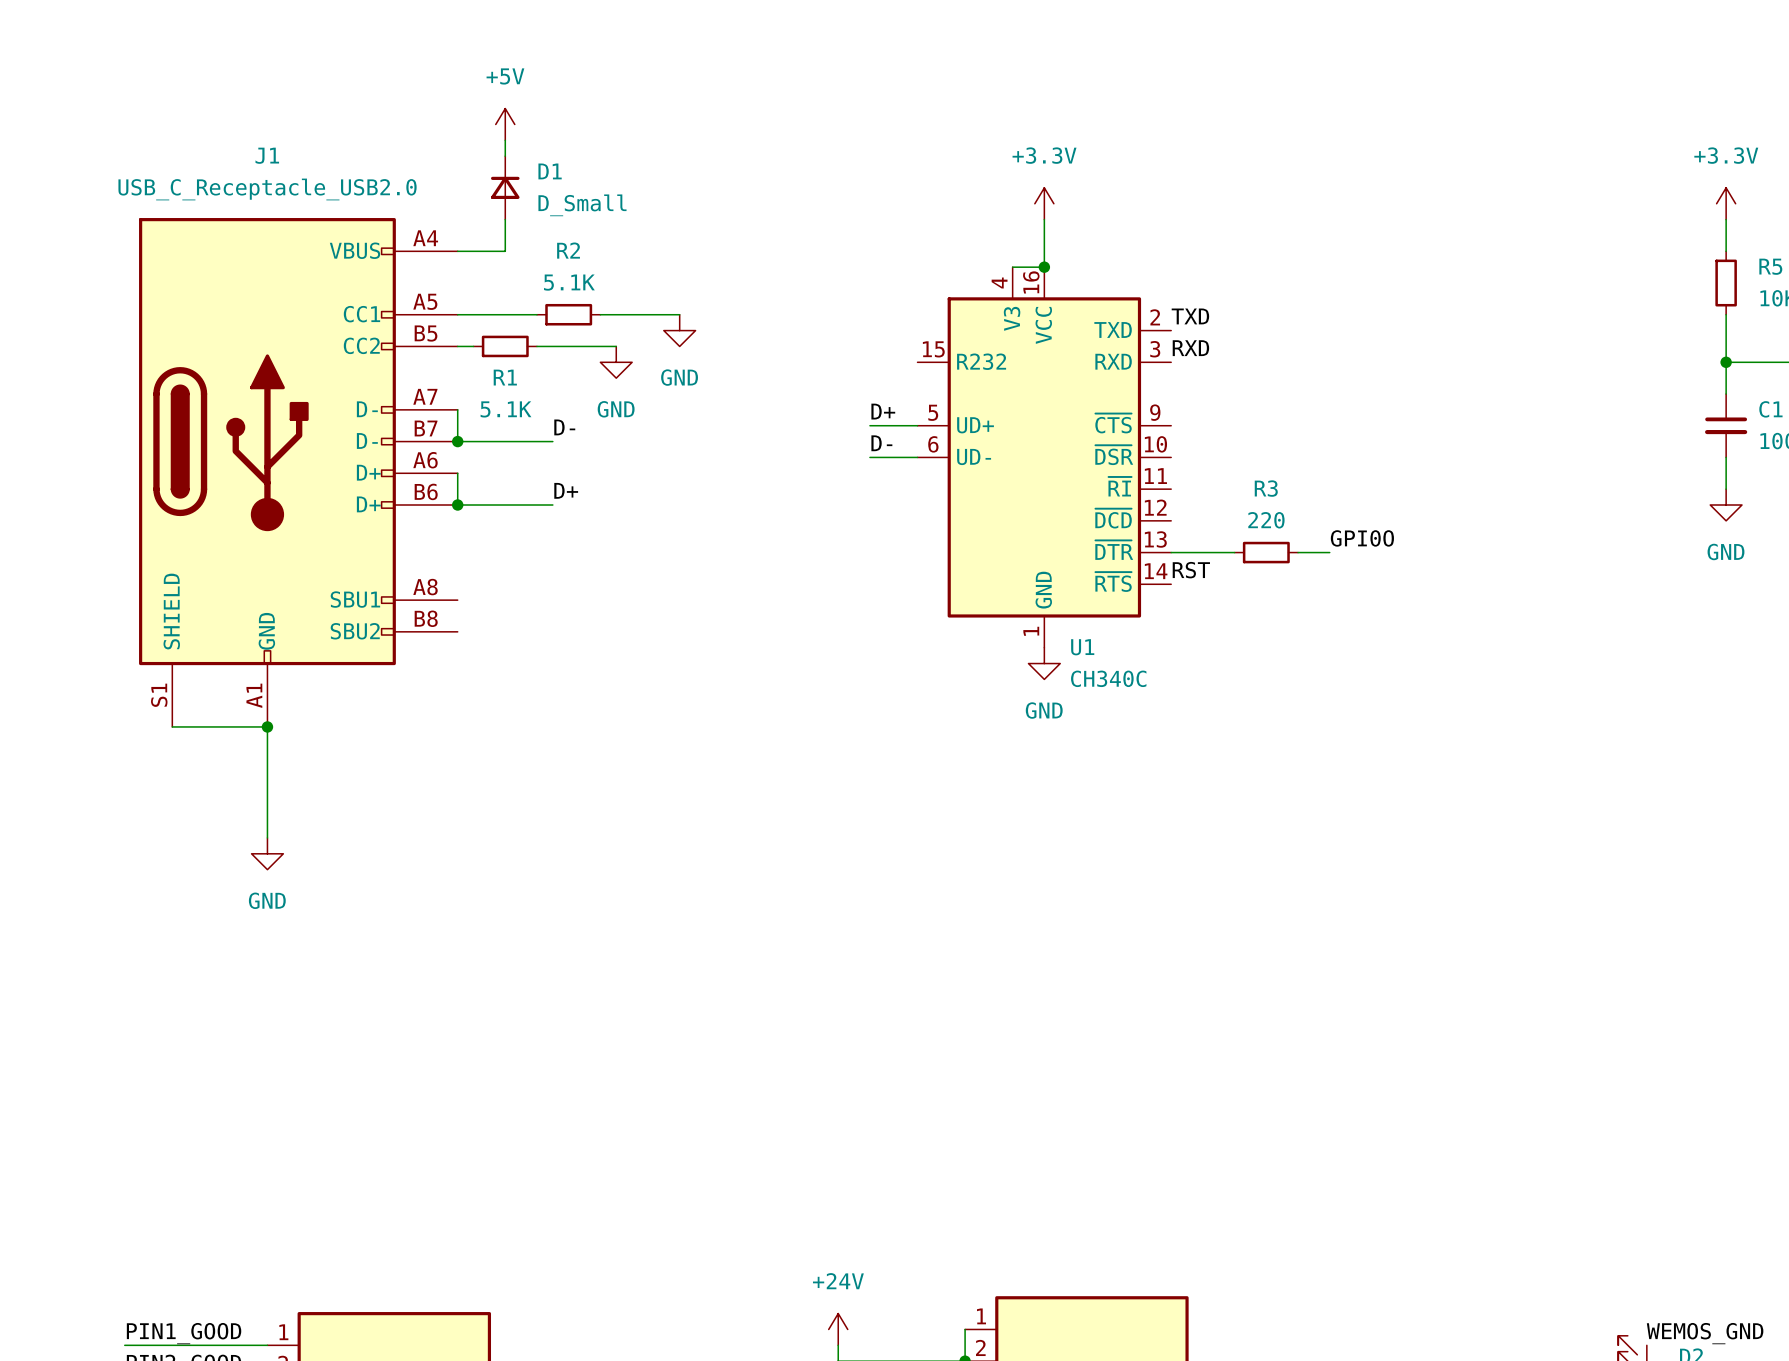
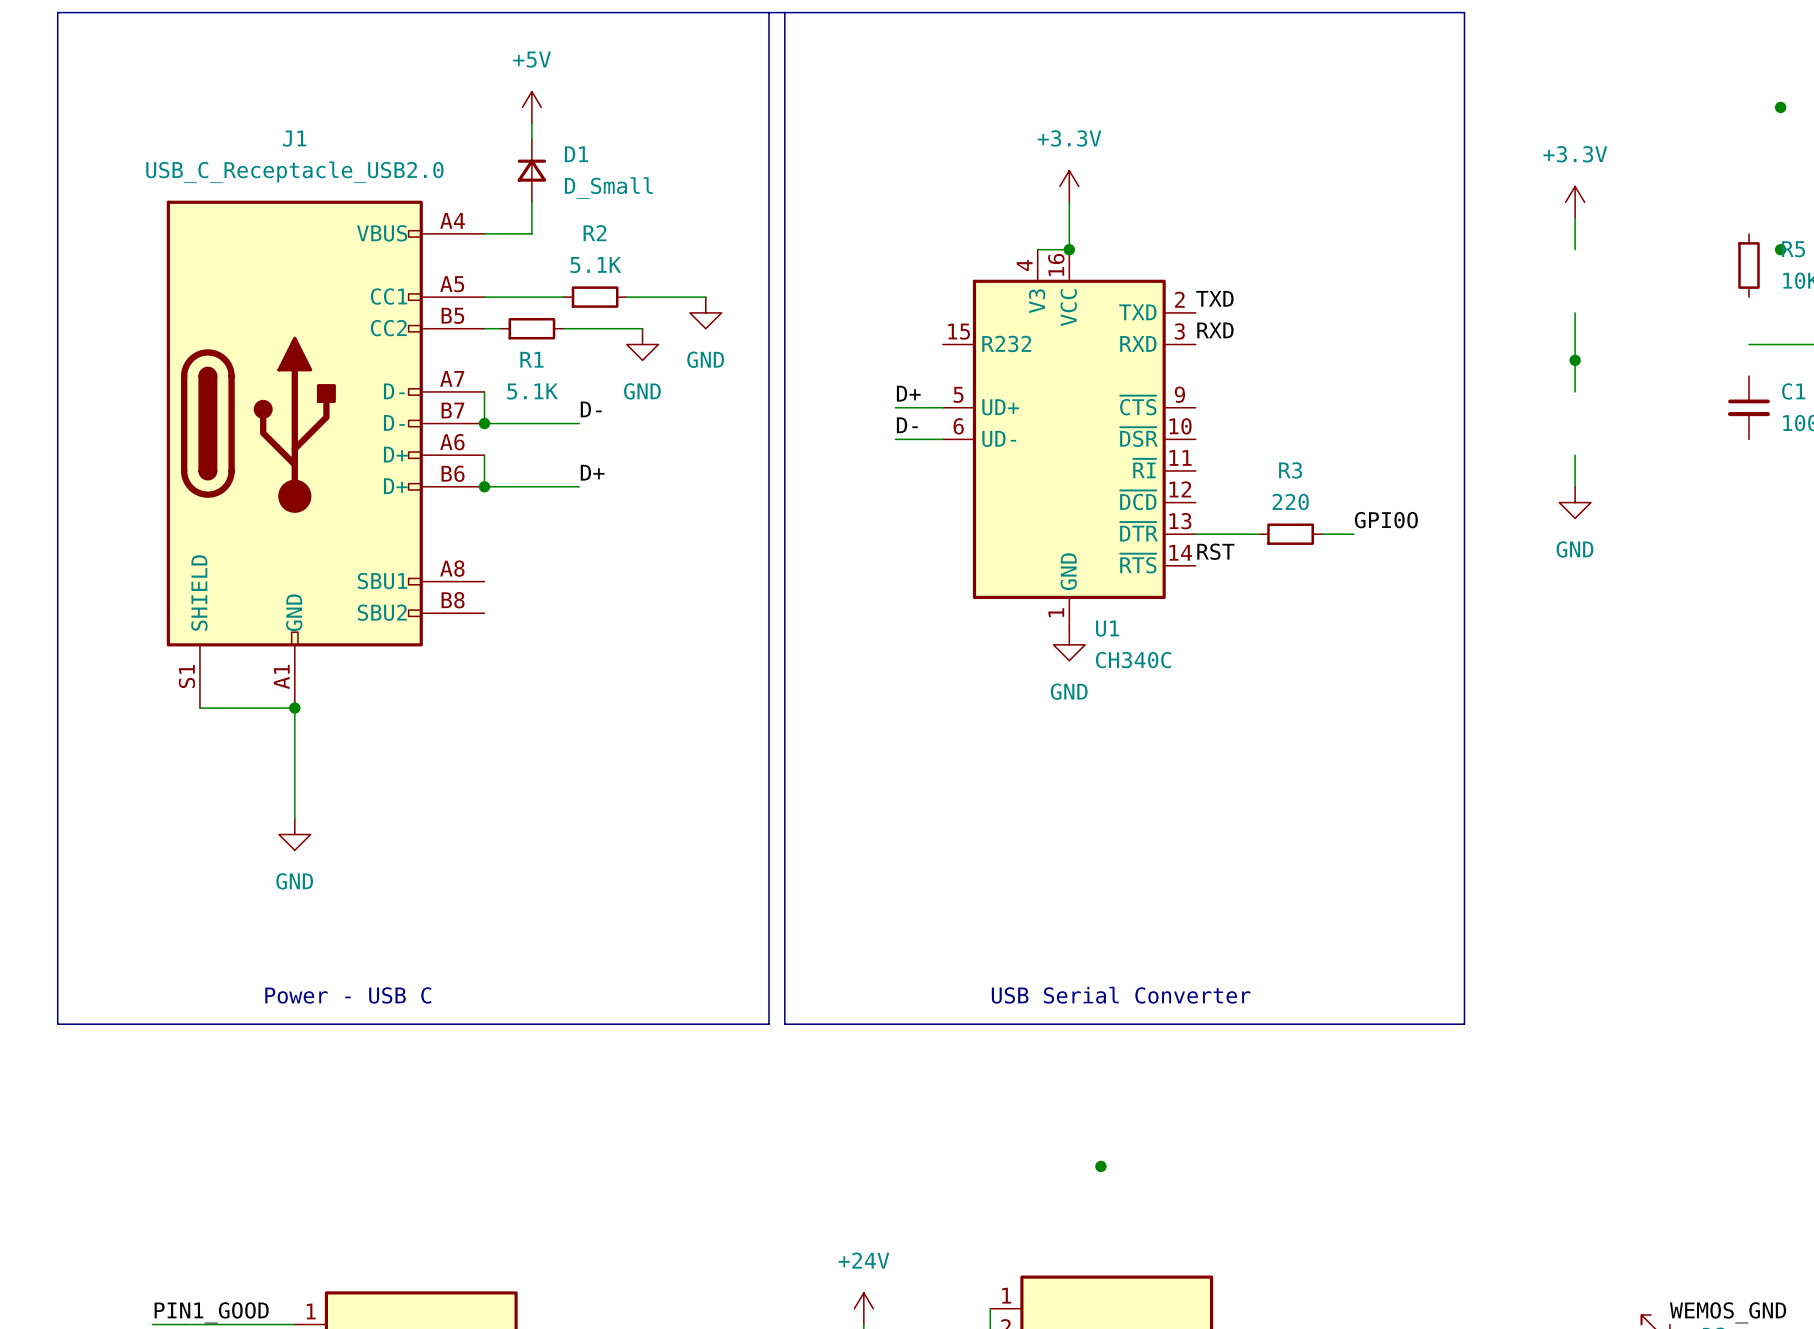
line: none -> (769, 12) (769, 1024) (57, 1024) (57, 12) (1464, 12) (1464, 1024) (784, 1024) (784, 12)
junction: none -> (1780, 107)
power symbol: +3.3V (1726, 203) -> none
power symbol: none -> +3.3V (1575, 202)
wire: (1726, 219) (1726, 251) -> (1575, 218) (1575, 249)
junction: none -> (1780, 249)
wire: (1726, 314) (1726, 394) -> (1575, 312) (1575, 391)
junction: (1726, 362) -> none
junction: none -> (1575, 360)
wire: (1726, 457) (1726, 489) -> (1575, 455) (1575, 486)
power symbol position: GND (1726, 505) -> GND (1575, 502)
text: none -> USB Serial Converter (1121, 995)
text: none -> Power - USB C (348, 995)
junction: none -> (1100, 1166)

